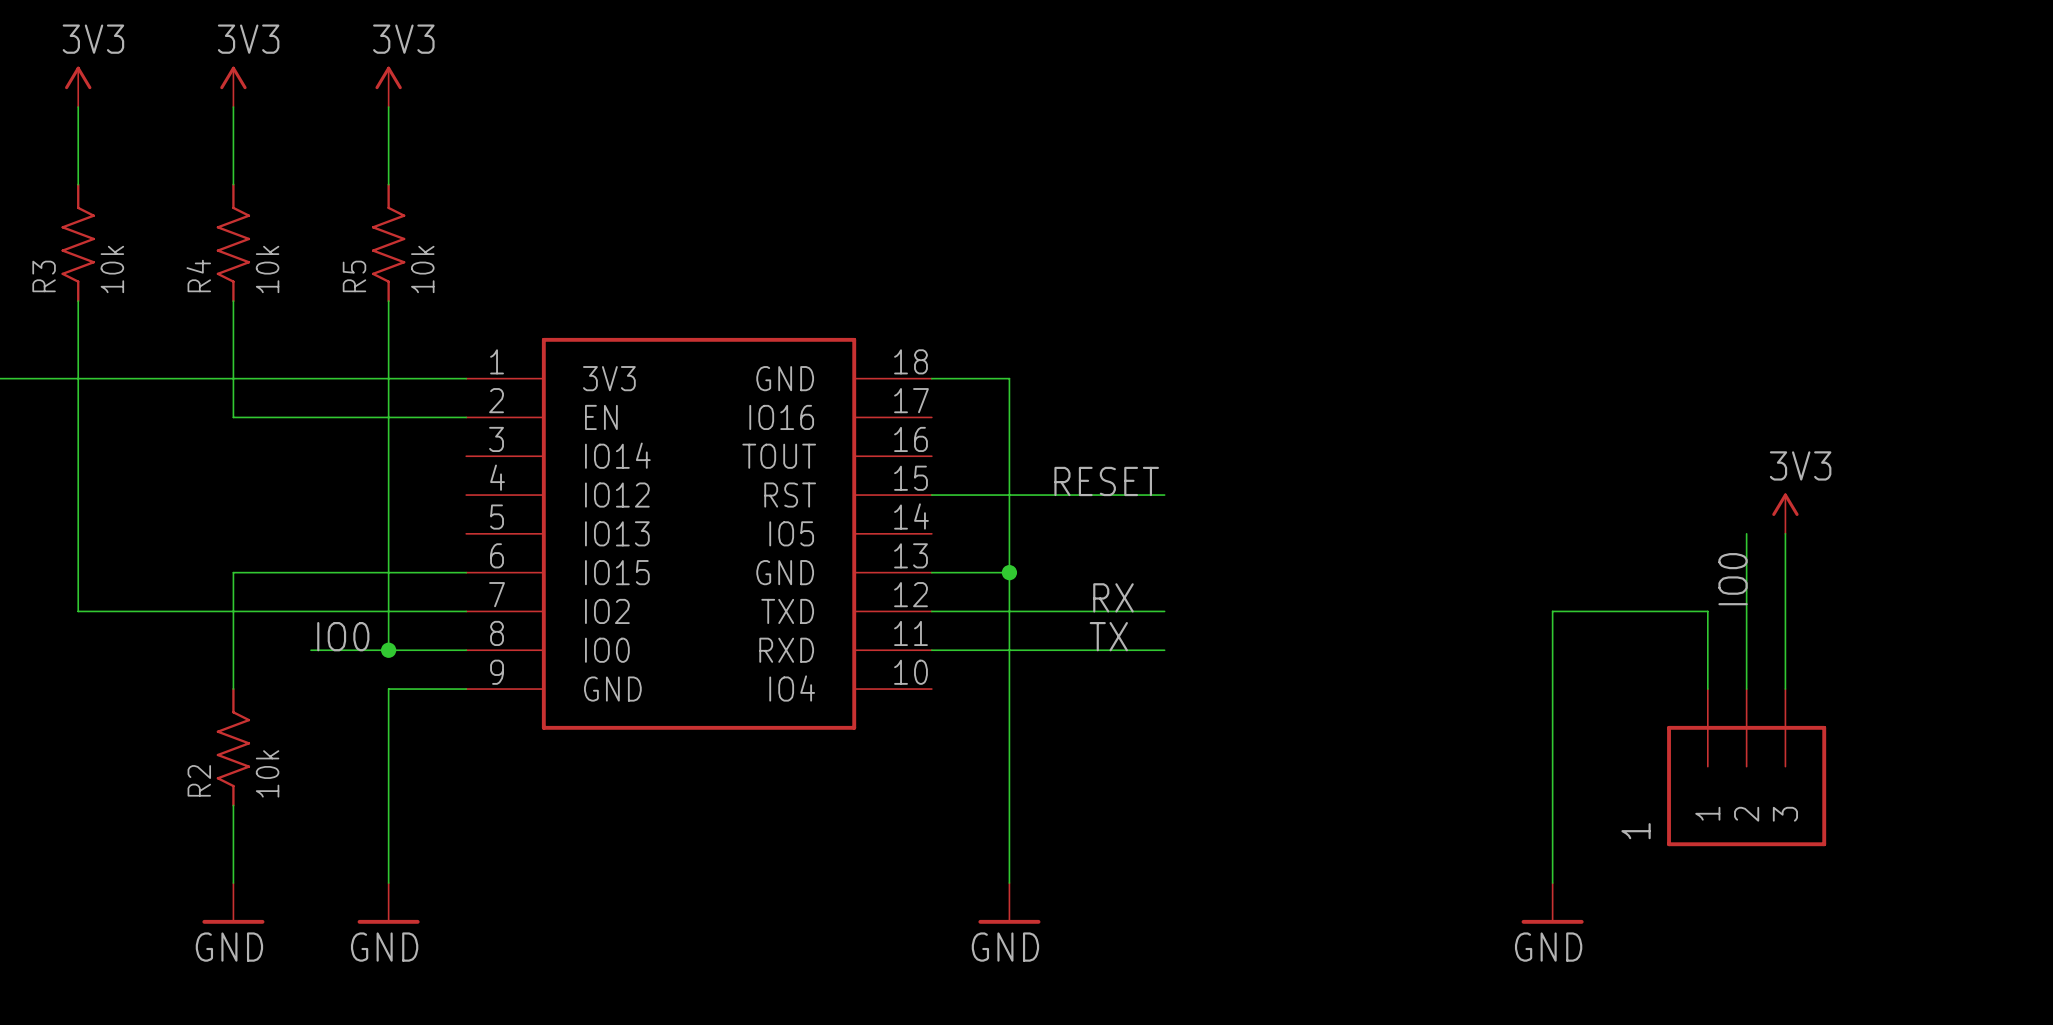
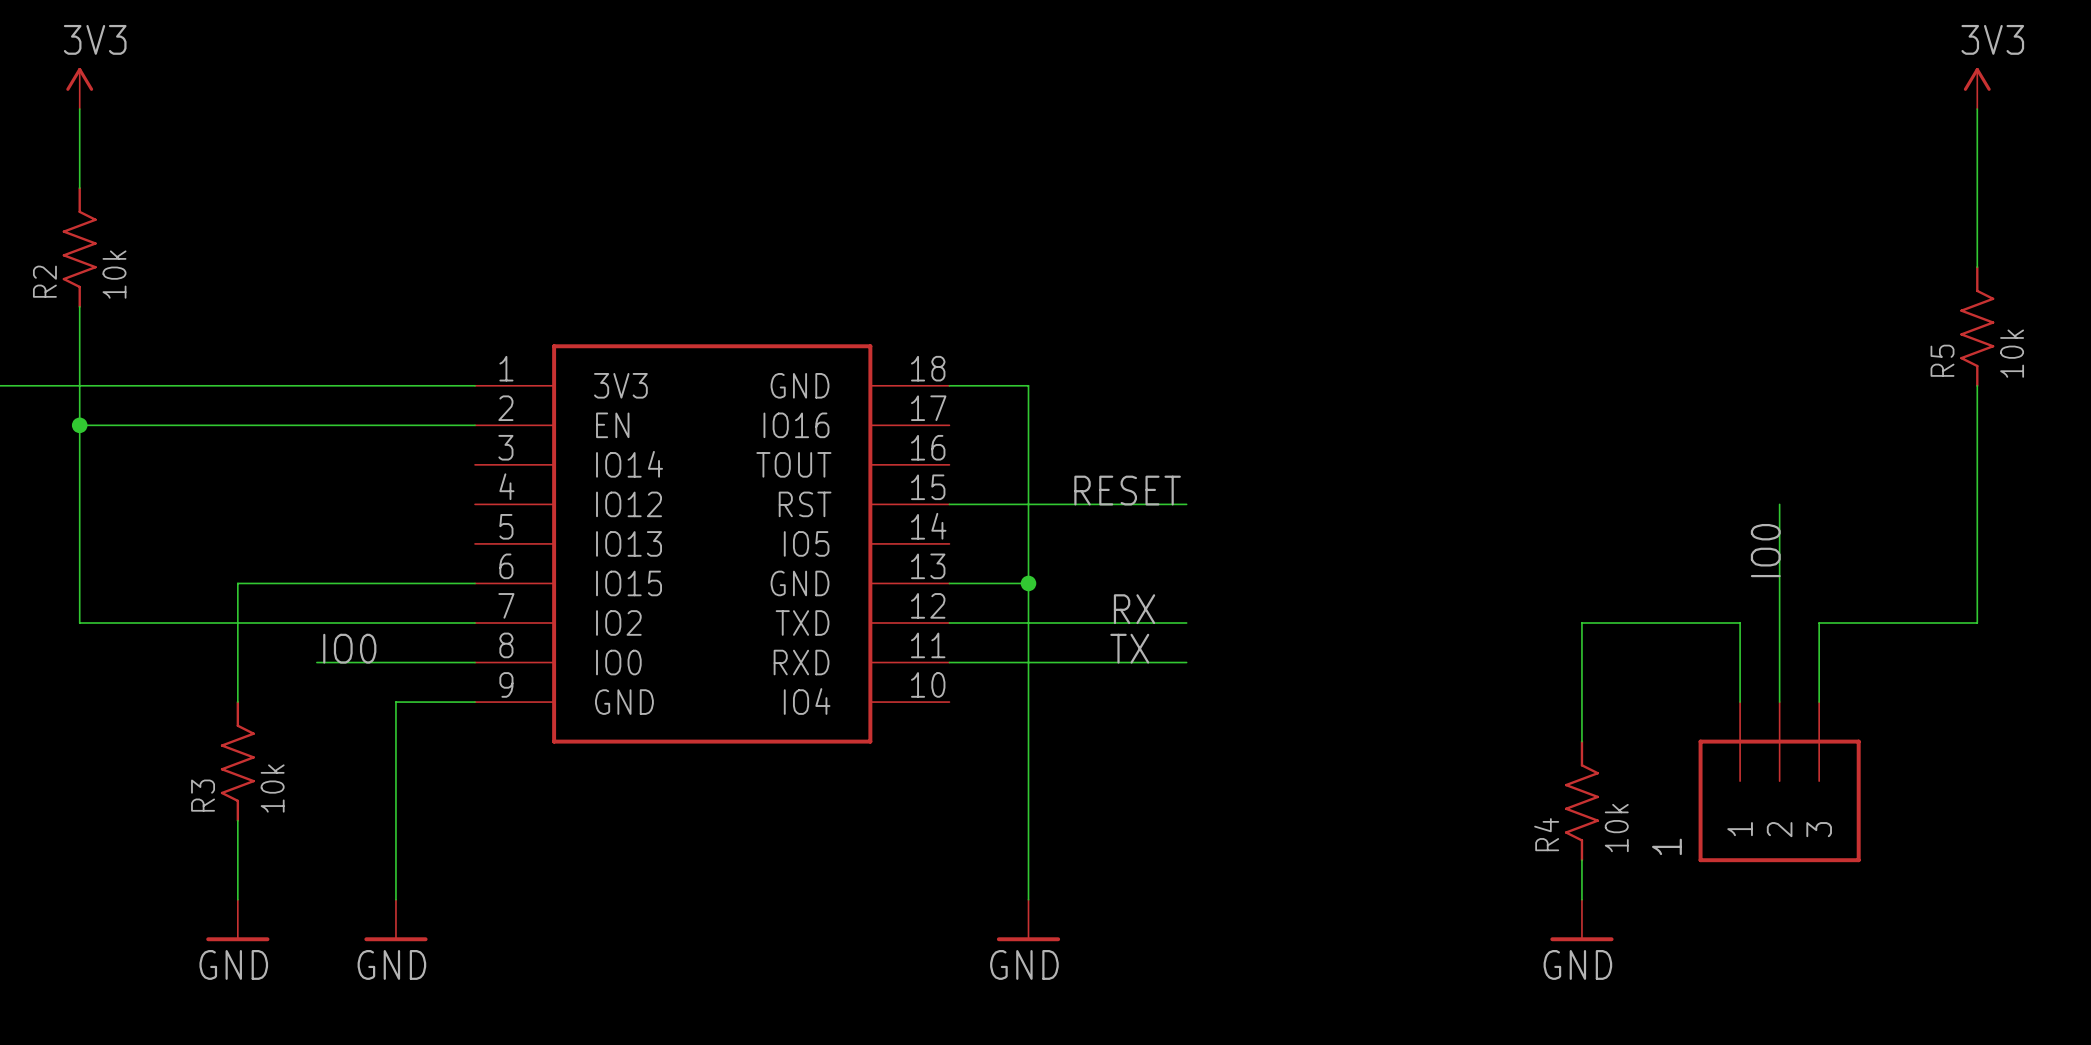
power symbol: 3V3 (233, 86) -> none
power symbol: 3V3 (388, 86) -> none
power symbol: none -> 3V3 (1977, 88)
wire: (233, 107) (233, 184) -> none
wire: (388, 107) (388, 184) -> none
wire: none -> (1977, 109) (1977, 267)
R4 position: (233, 242) -> (1581, 800)
R5 position: (388, 242) -> (1977, 326)
R3 name: R3 (44, 276) -> R2 (44, 281)
wire: (233, 301) (233, 417) -> (79, 425) (237, 425)
wire: (388, 301) (388, 650) -> none
junction: none -> (79, 425)
wire: none -> (1779, 504) (1779, 543)
power symbol: 3V3 (1785, 513) -> none
wire: (1785, 533) (1785, 611) -> (1977, 385) (1977, 622) (1819, 622)
label position: IO0 (1733, 579) -> IO0 (1765, 550)
junction: (388, 650) -> none
wire: (1552, 727) (1552, 844) -> none
R2 name: R2 (199, 780) -> R3 (203, 795)

